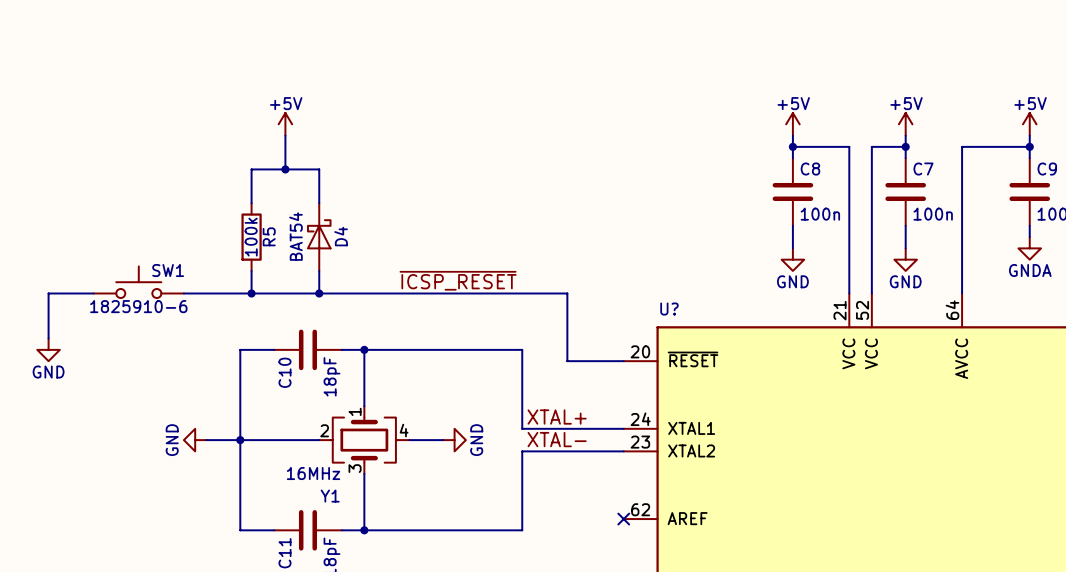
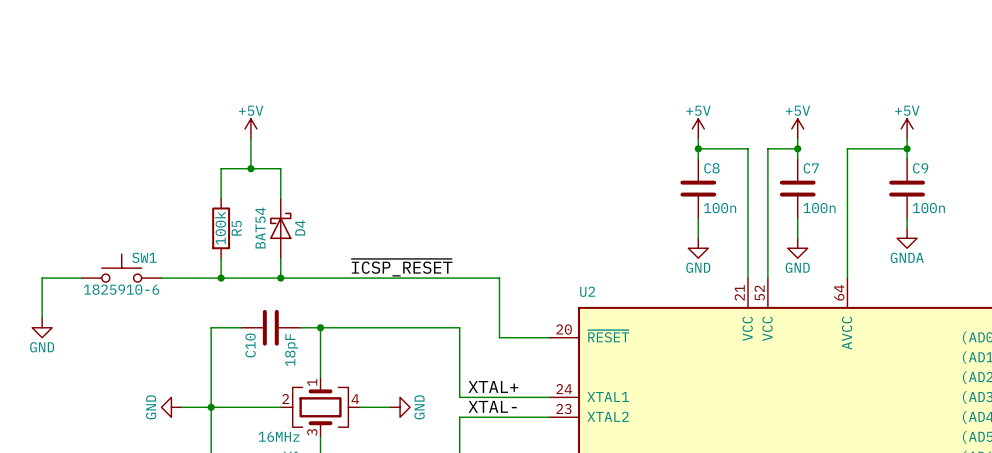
U? name: U? (669, 309) -> U2 (587, 291)

